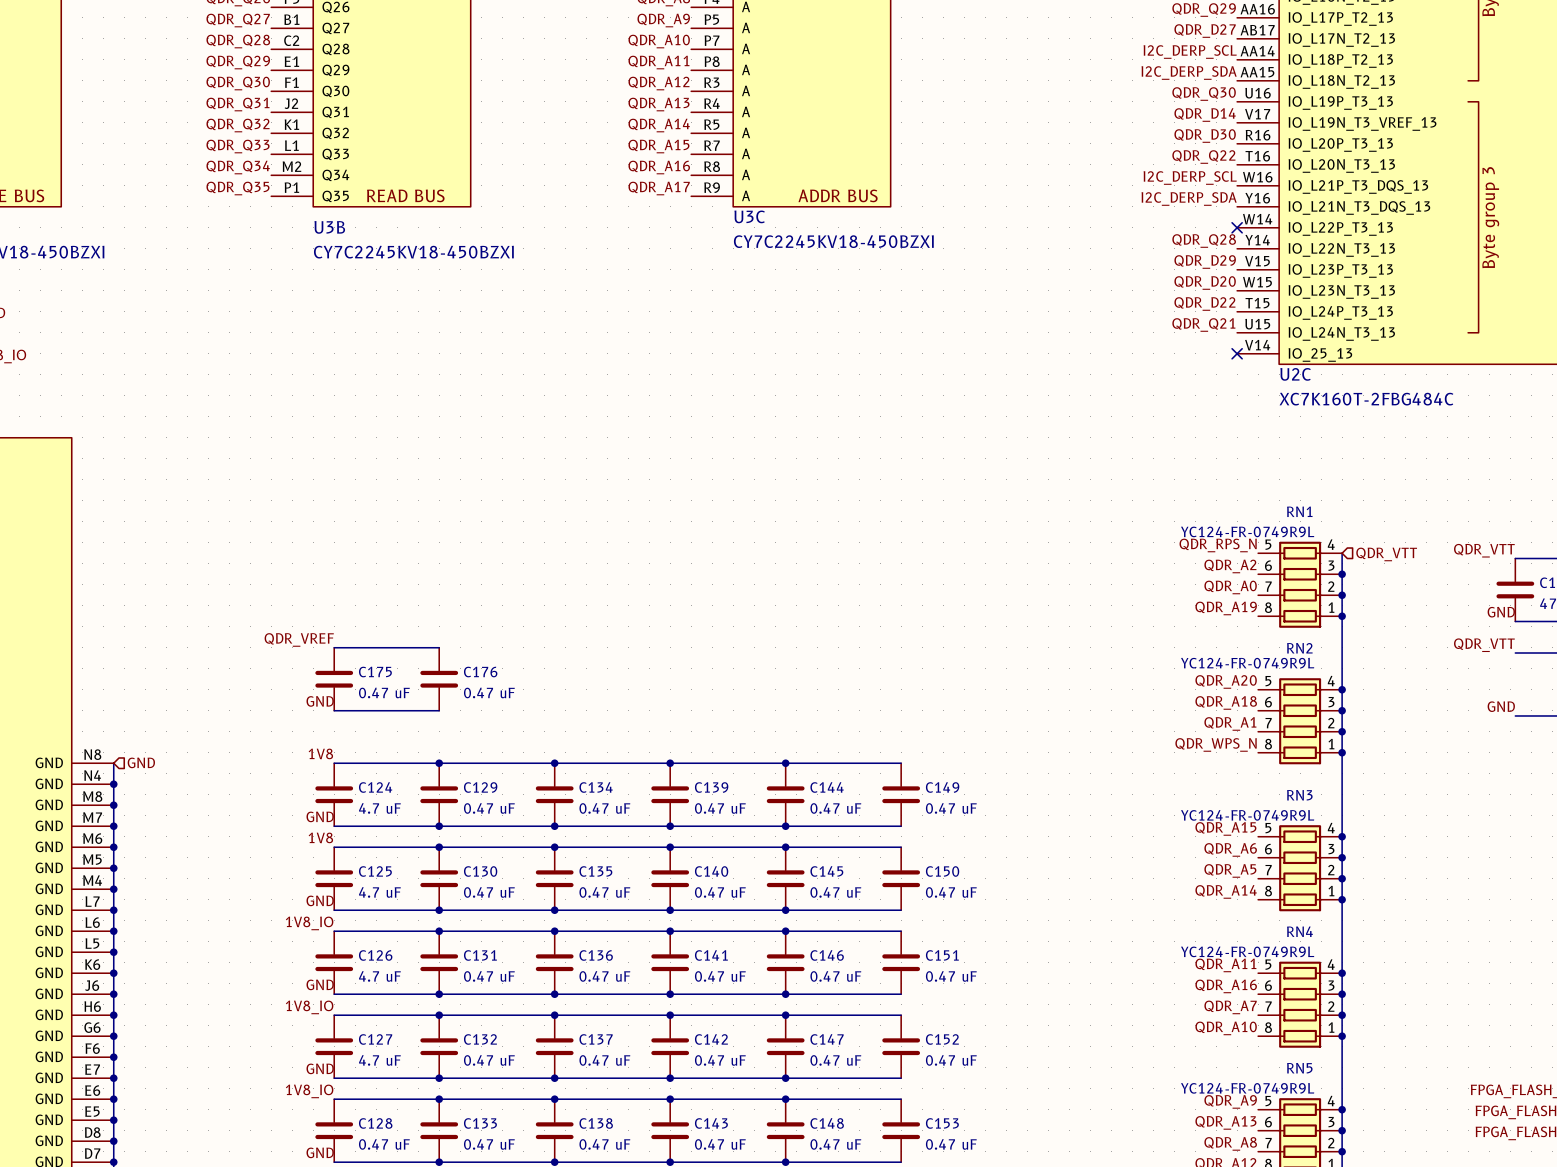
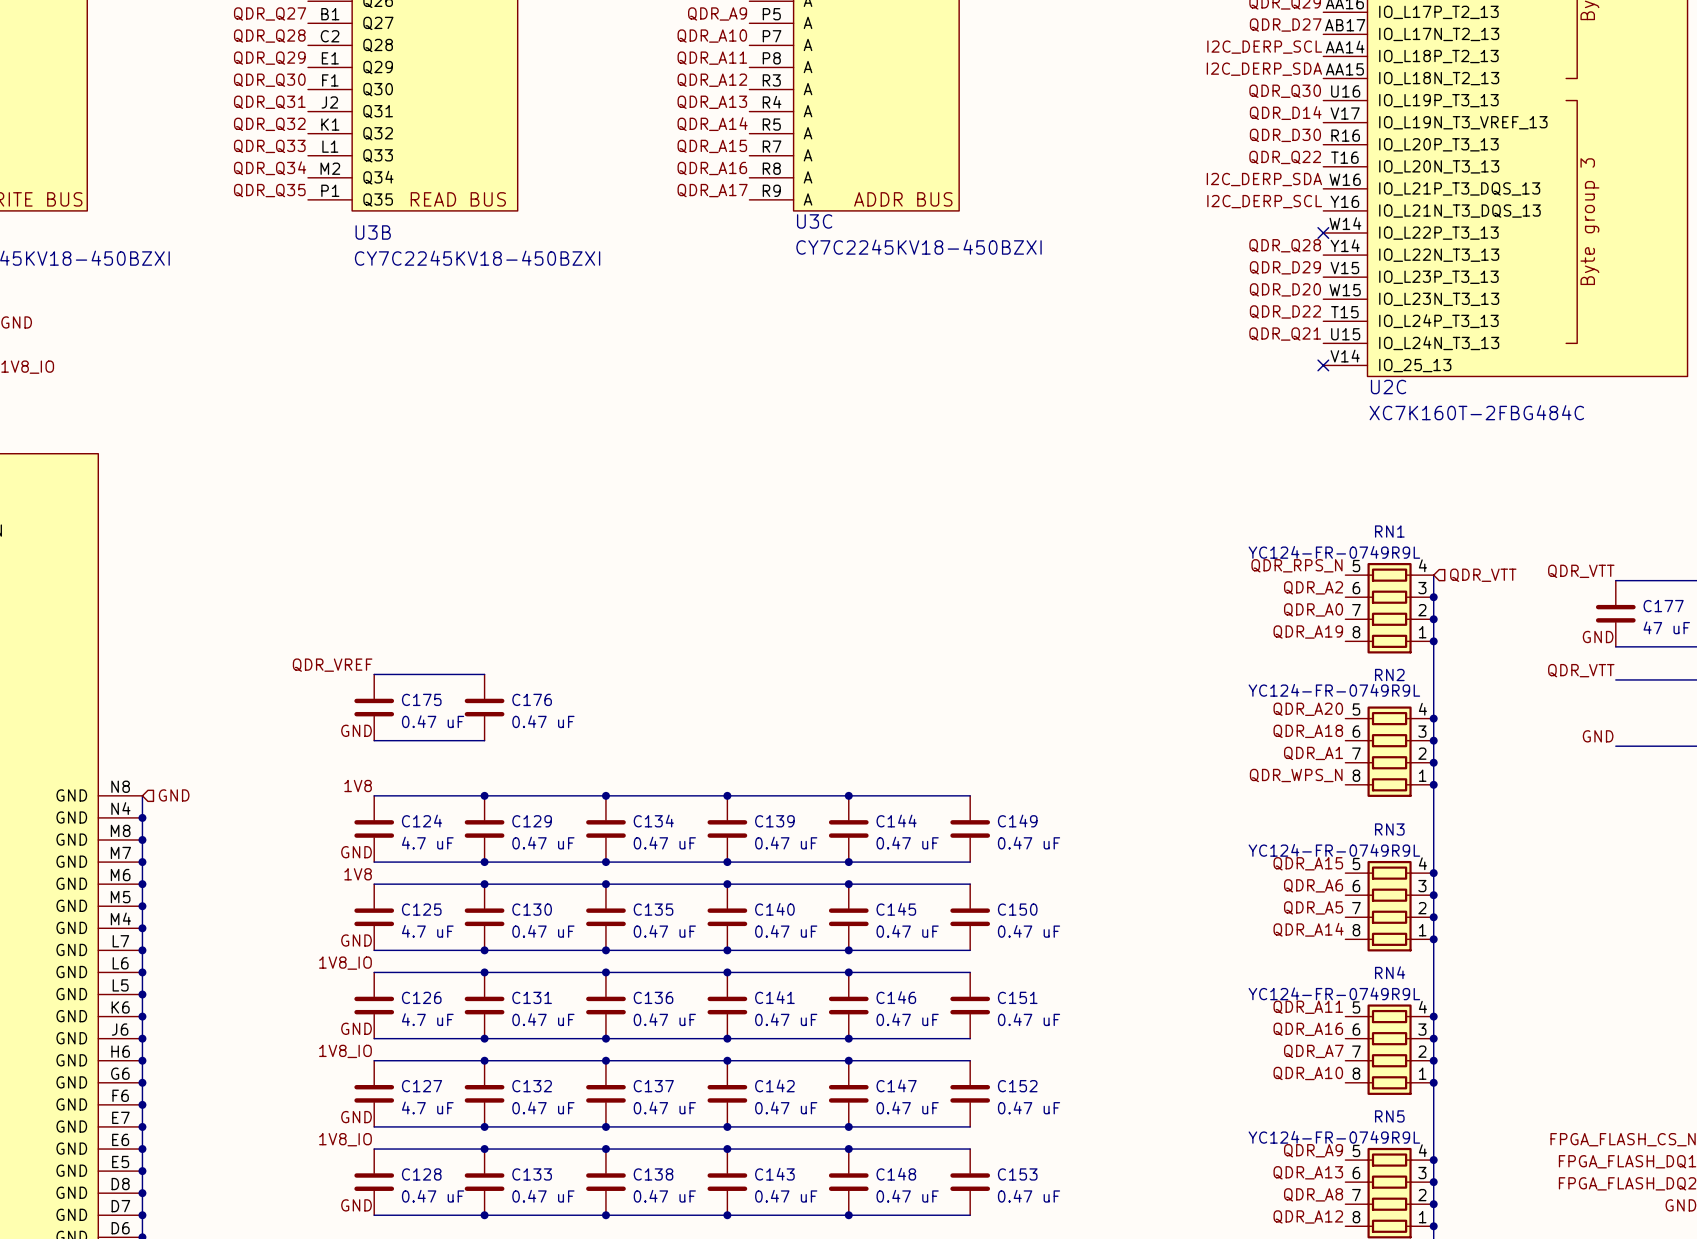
label: I2C_DERP_SCL (1190, 178) -> I2C_DERP_SDA (1264, 179)
label: I2C_DERP_SDA (1189, 199) -> I2C_DERP_SCL (1264, 201)

